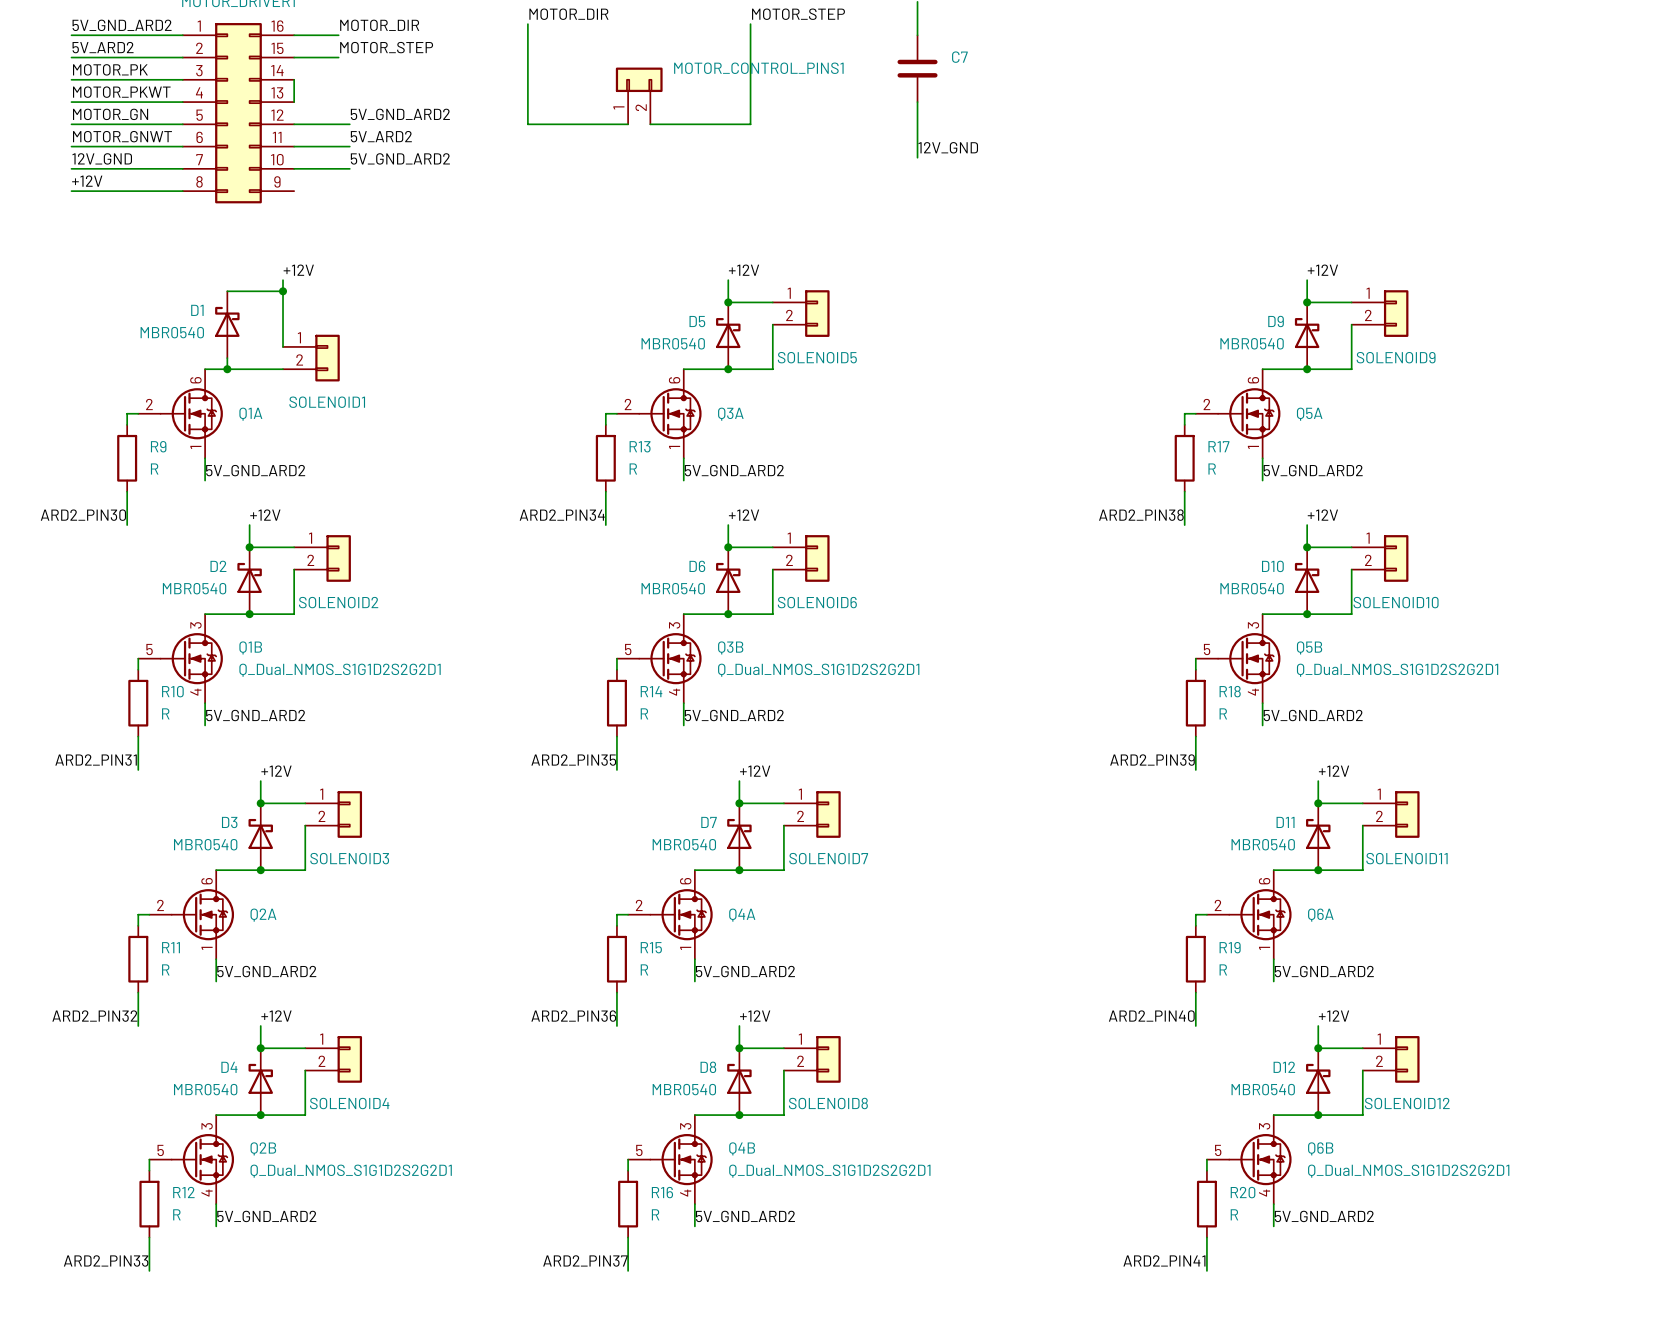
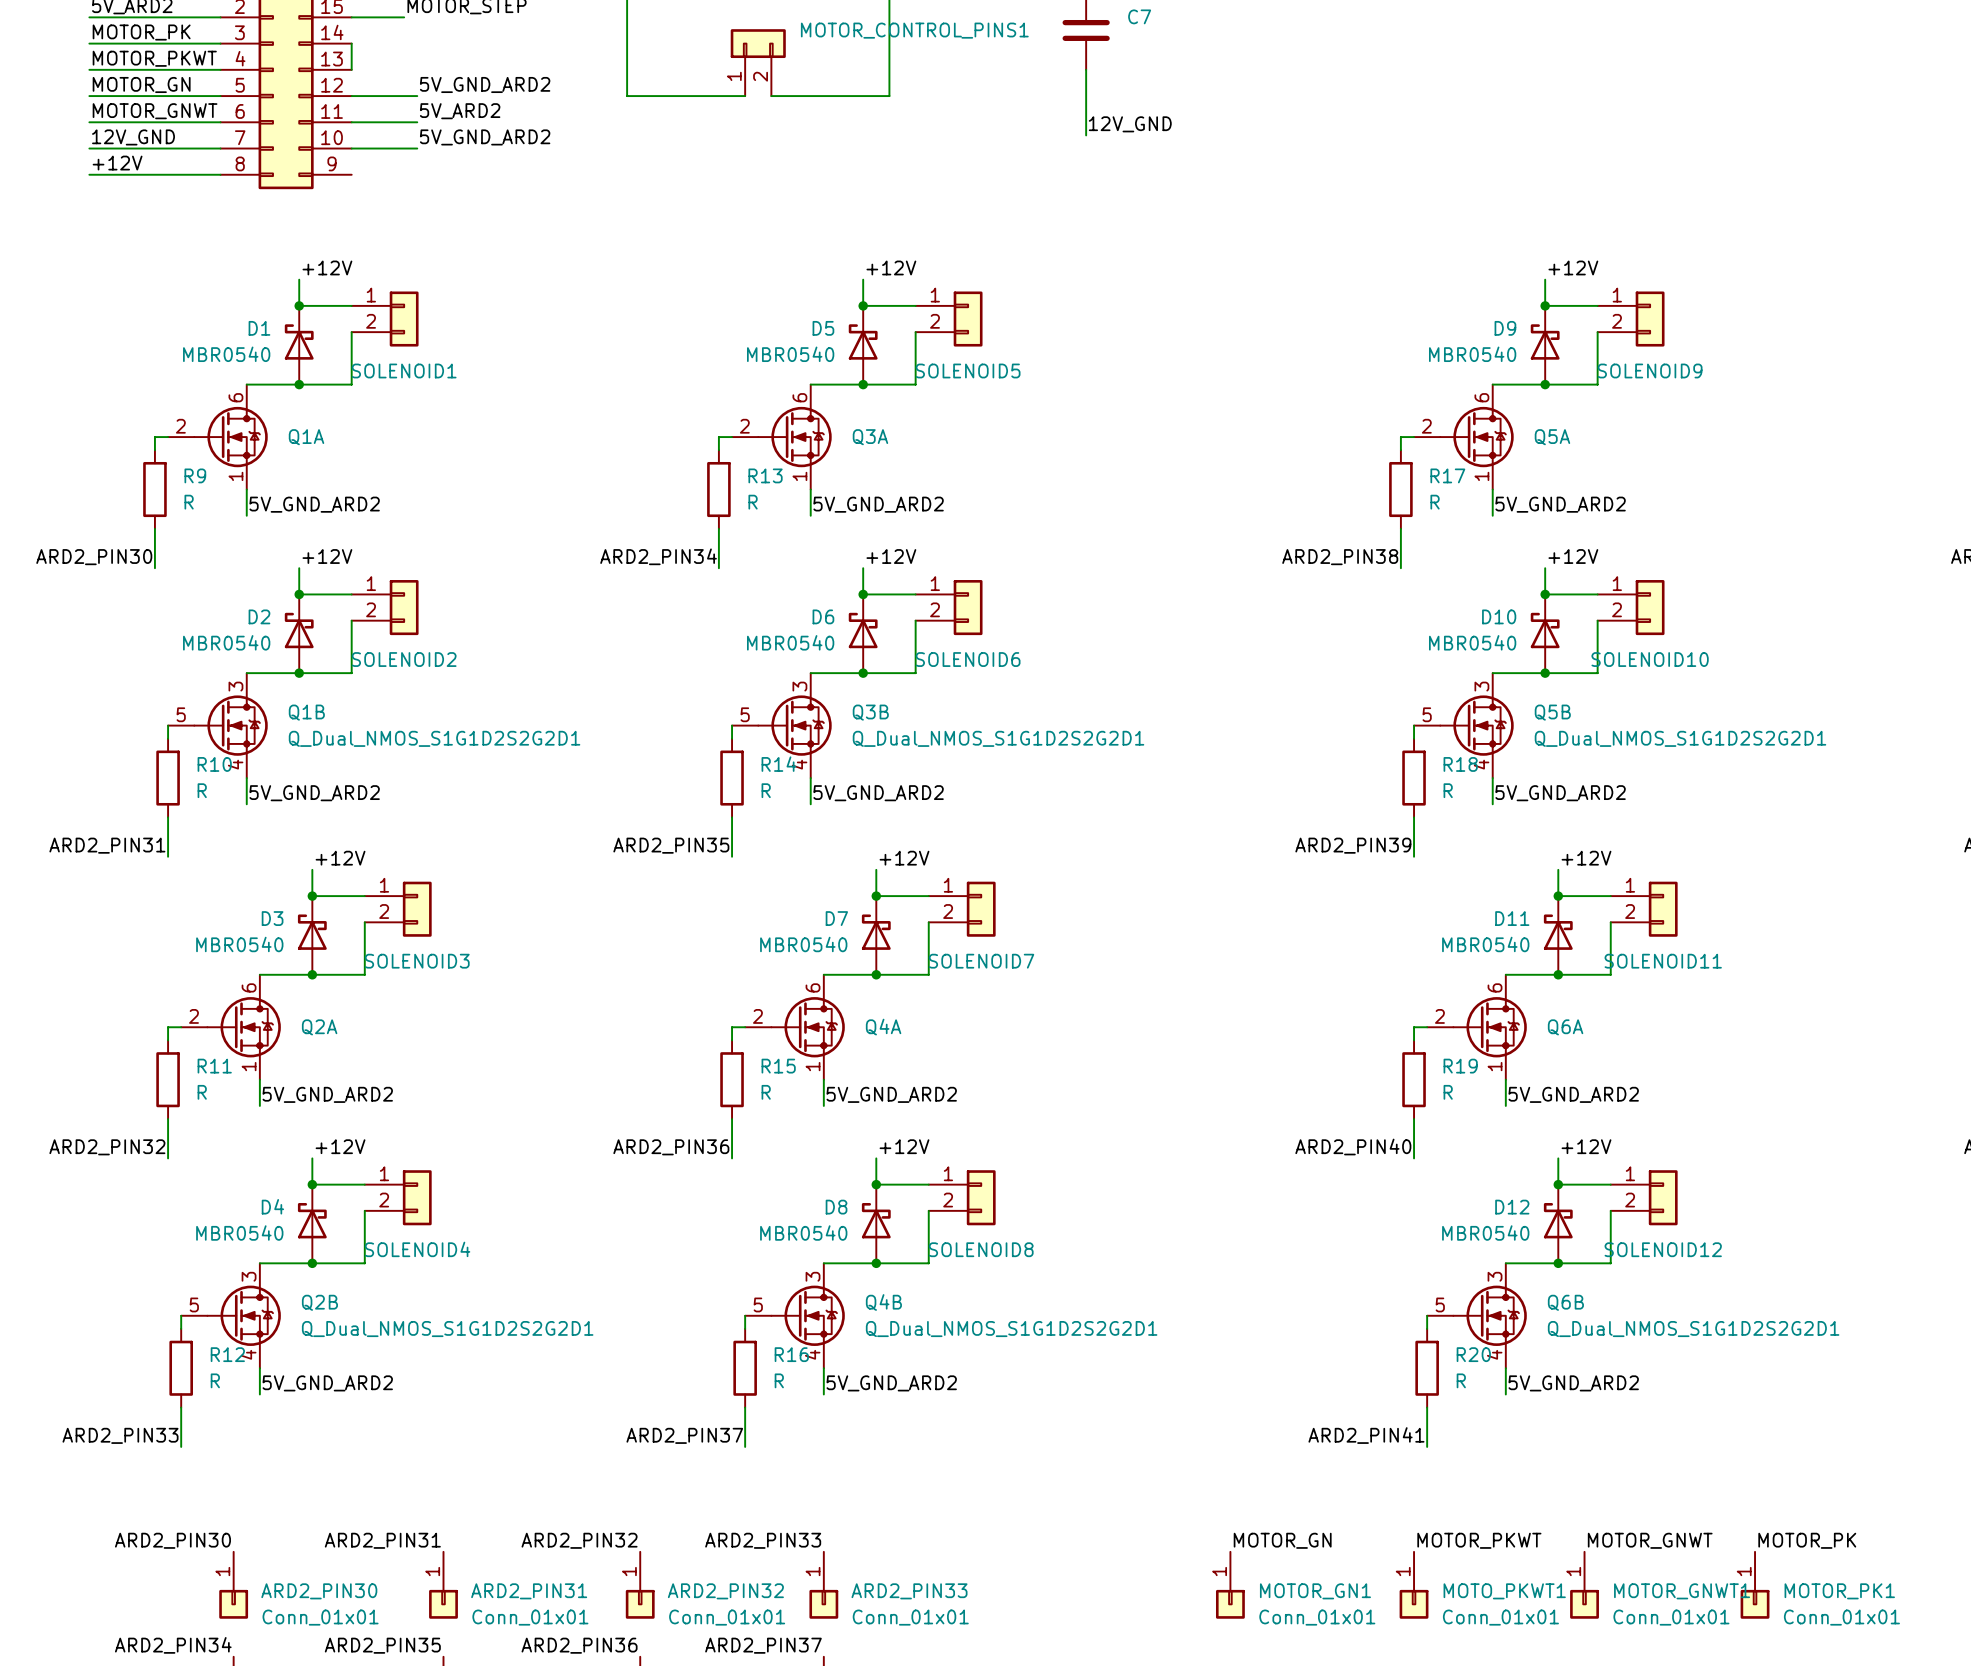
label position: +12V (298, 270) -> +12V (327, 267)
wire: none -> (299, 279) (299, 305) (351, 305)
wire: (283, 280) (283, 346) -> none
wire: (227, 291) (283, 291) -> none
junction: (283, 291) -> none
junction: none -> (299, 305)
D1 position: (227, 324) -> (299, 345)
wire: none -> (351, 332) (351, 384) (338, 384)
wire: (227, 358) (227, 369) -> none
SOLENOID1 position: (311, 358) -> (385, 319)
junction position: (227, 369) -> (299, 384)

